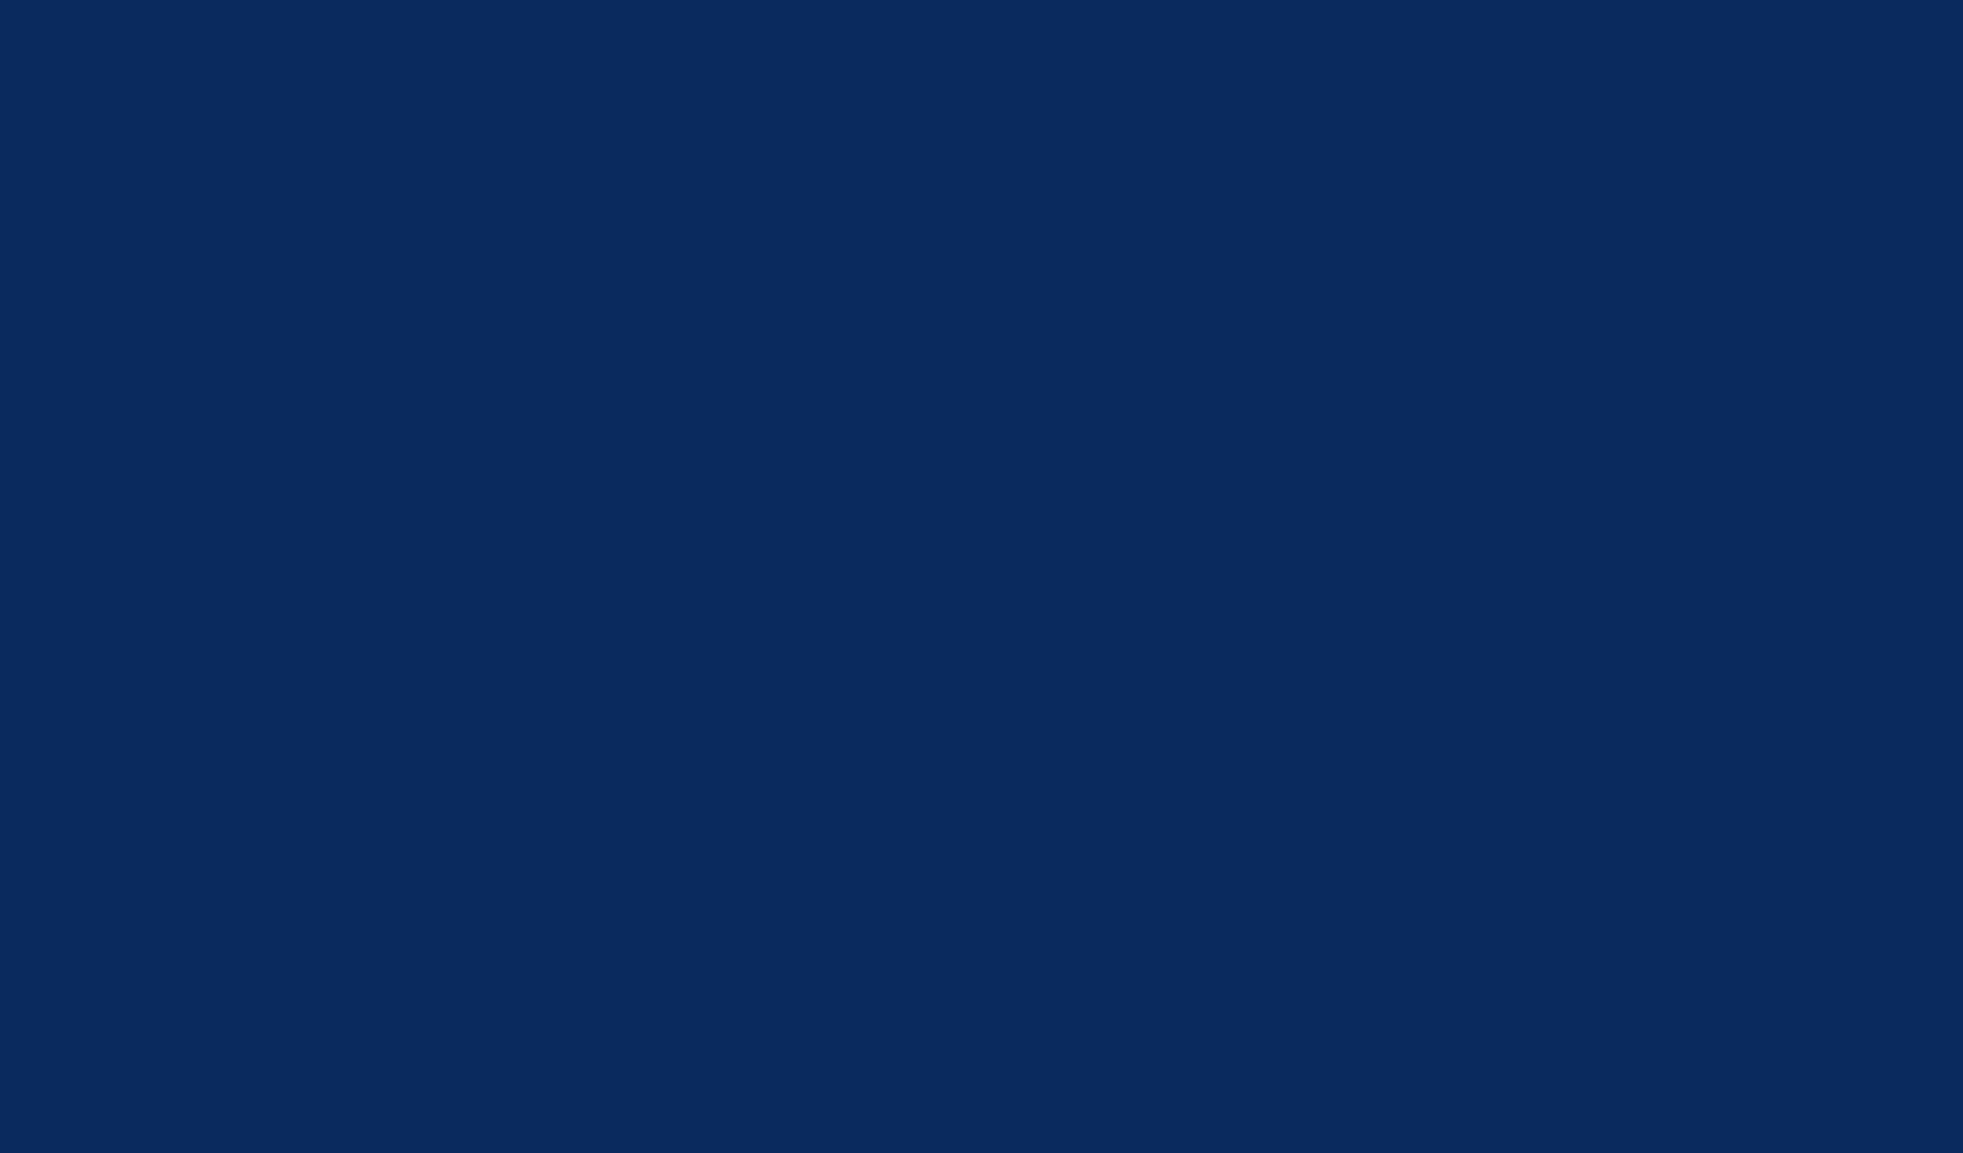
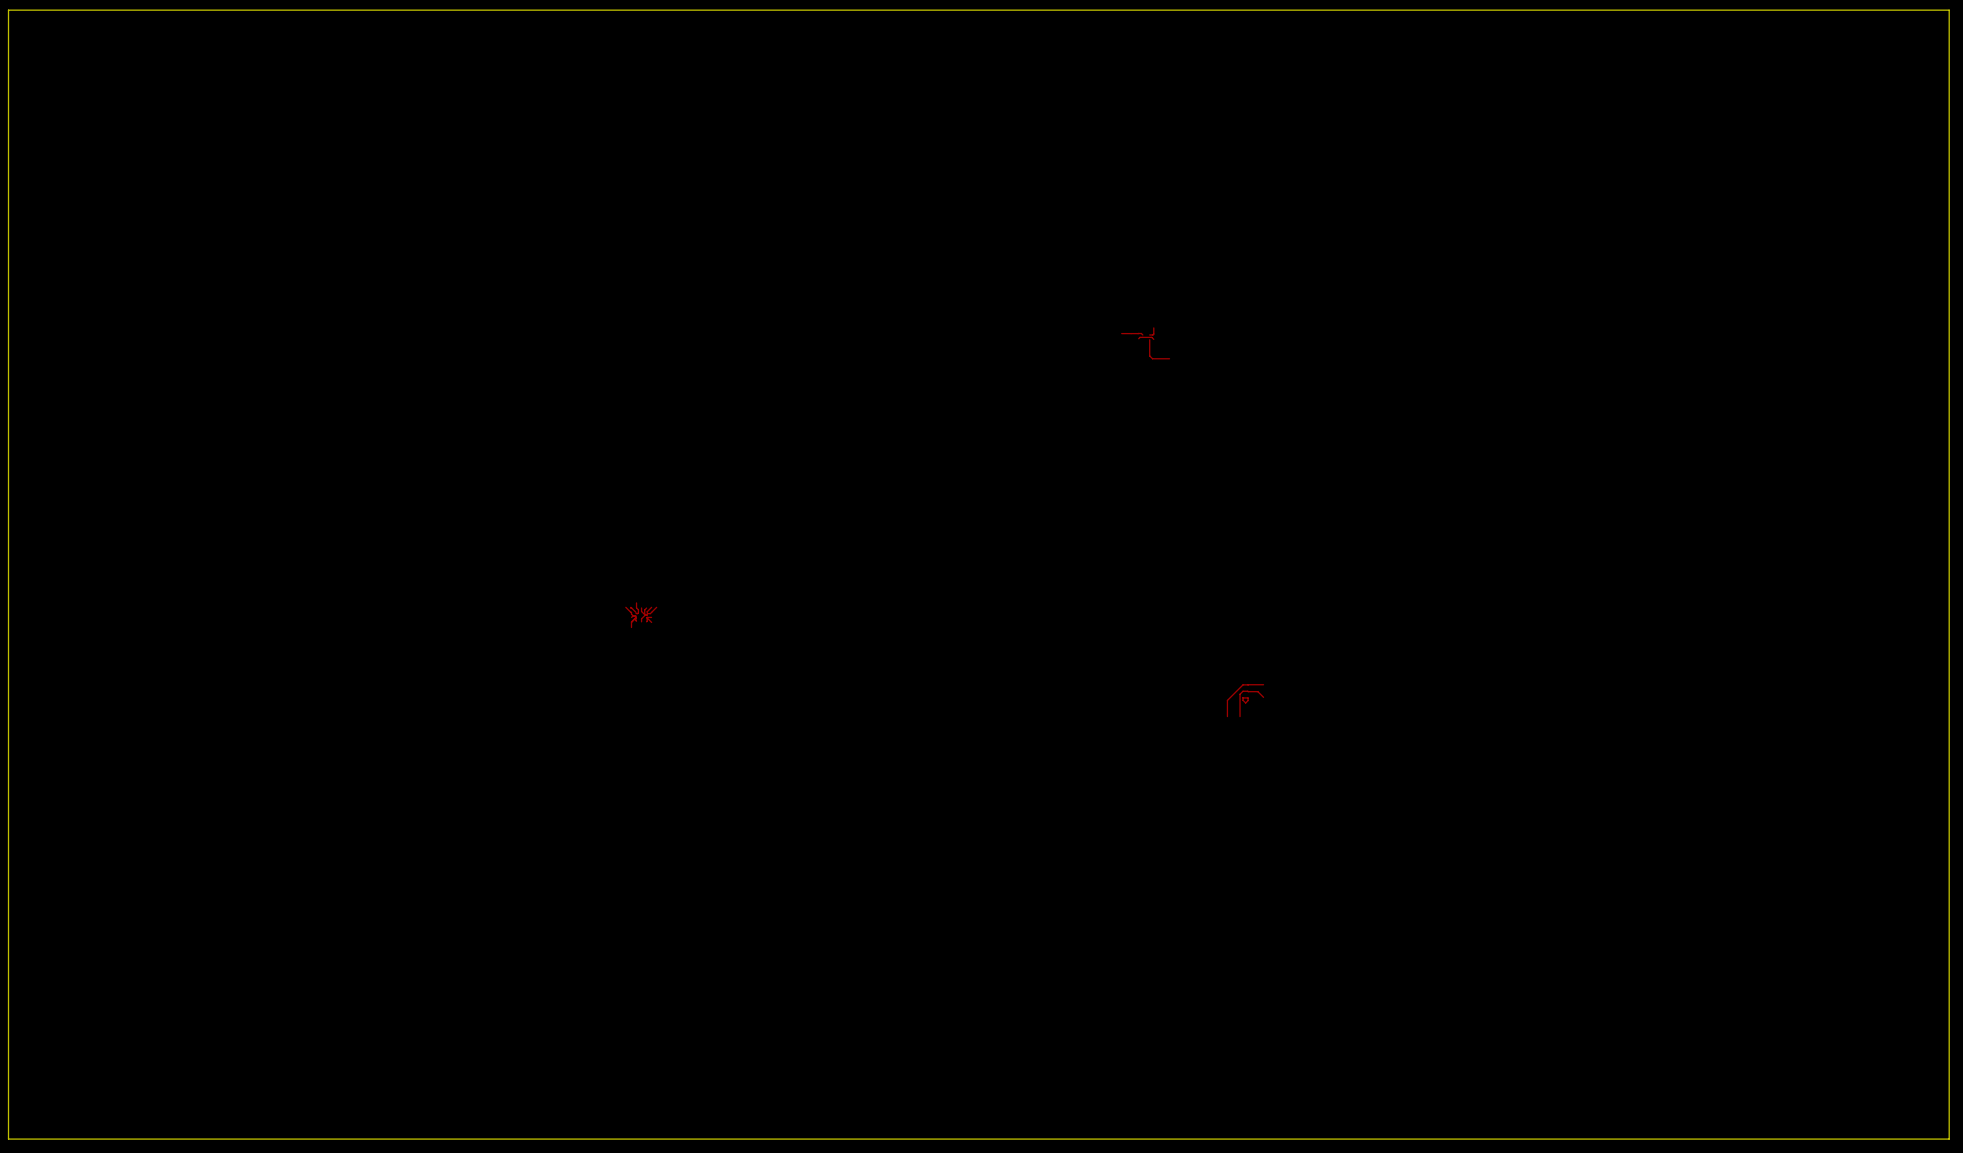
board edge: none -> (8, 10) (1949, 10) (1949, 1139) (8, 1139) (8, 10)
track: none -> (1153, 327) (1153, 334) (1149, 334)
track: none -> (1121, 333) (1142, 334)
track: none -> (1138, 338) (1151, 337) (1153, 339)
track: none -> (1149, 339) (1149, 355) (1152, 358) (1169, 358)
track: none -> (636, 602) (638, 612) (635, 613)
track: none -> (625, 607) (633, 616)
track: none -> (630, 607) (635, 612)
track: none -> (641, 607) (641, 611) (647, 614)
track: none -> (651, 607) (647, 612)
track: none -> (656, 607) (650, 613) (647, 613)
track: none -> (646, 608) (641, 621)
track: none -> (635, 616) (631, 617)
track: none -> (635, 617) (631, 622)
track: none -> (647, 617) (651, 622)
track: none -> (651, 617) (647, 617) (646, 621)
track: none -> (636, 621) (635, 617) (631, 621) (631, 627)
track: none -> (1263, 684) (1243, 684) (1227, 700) (1227, 716)
track: none -> (1243, 697) (1248, 697) (1245, 702) (1243, 700) (1243, 697)
track: none -> (1263, 697) (1257, 691) (1243, 691) (1240, 694) (1240, 716)

